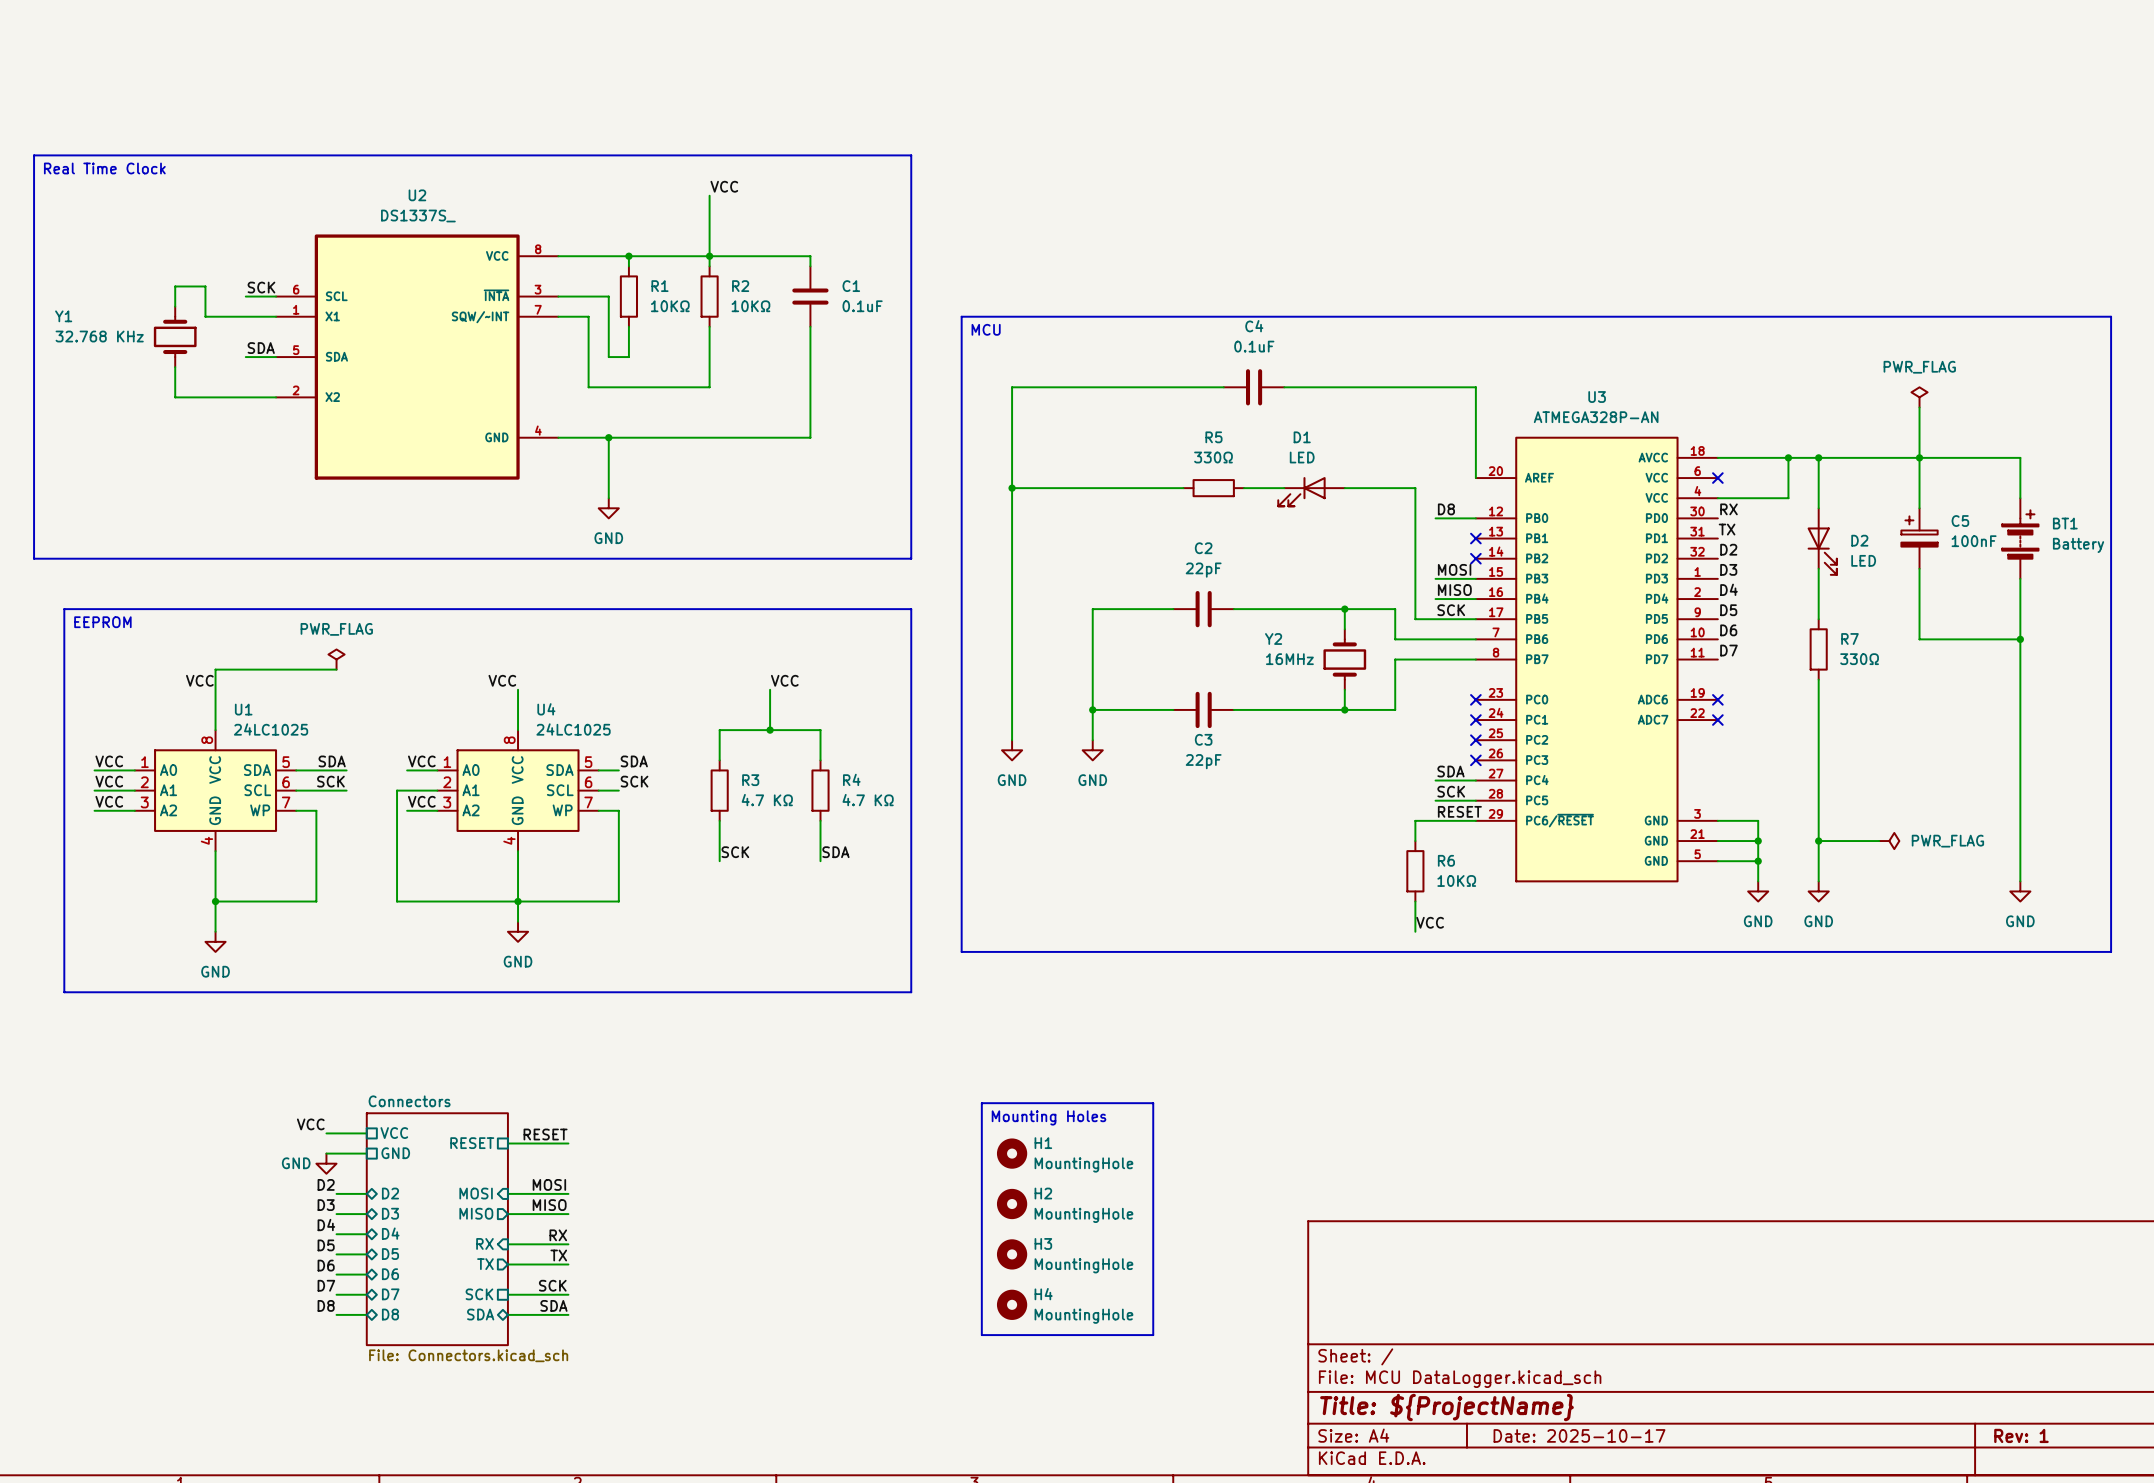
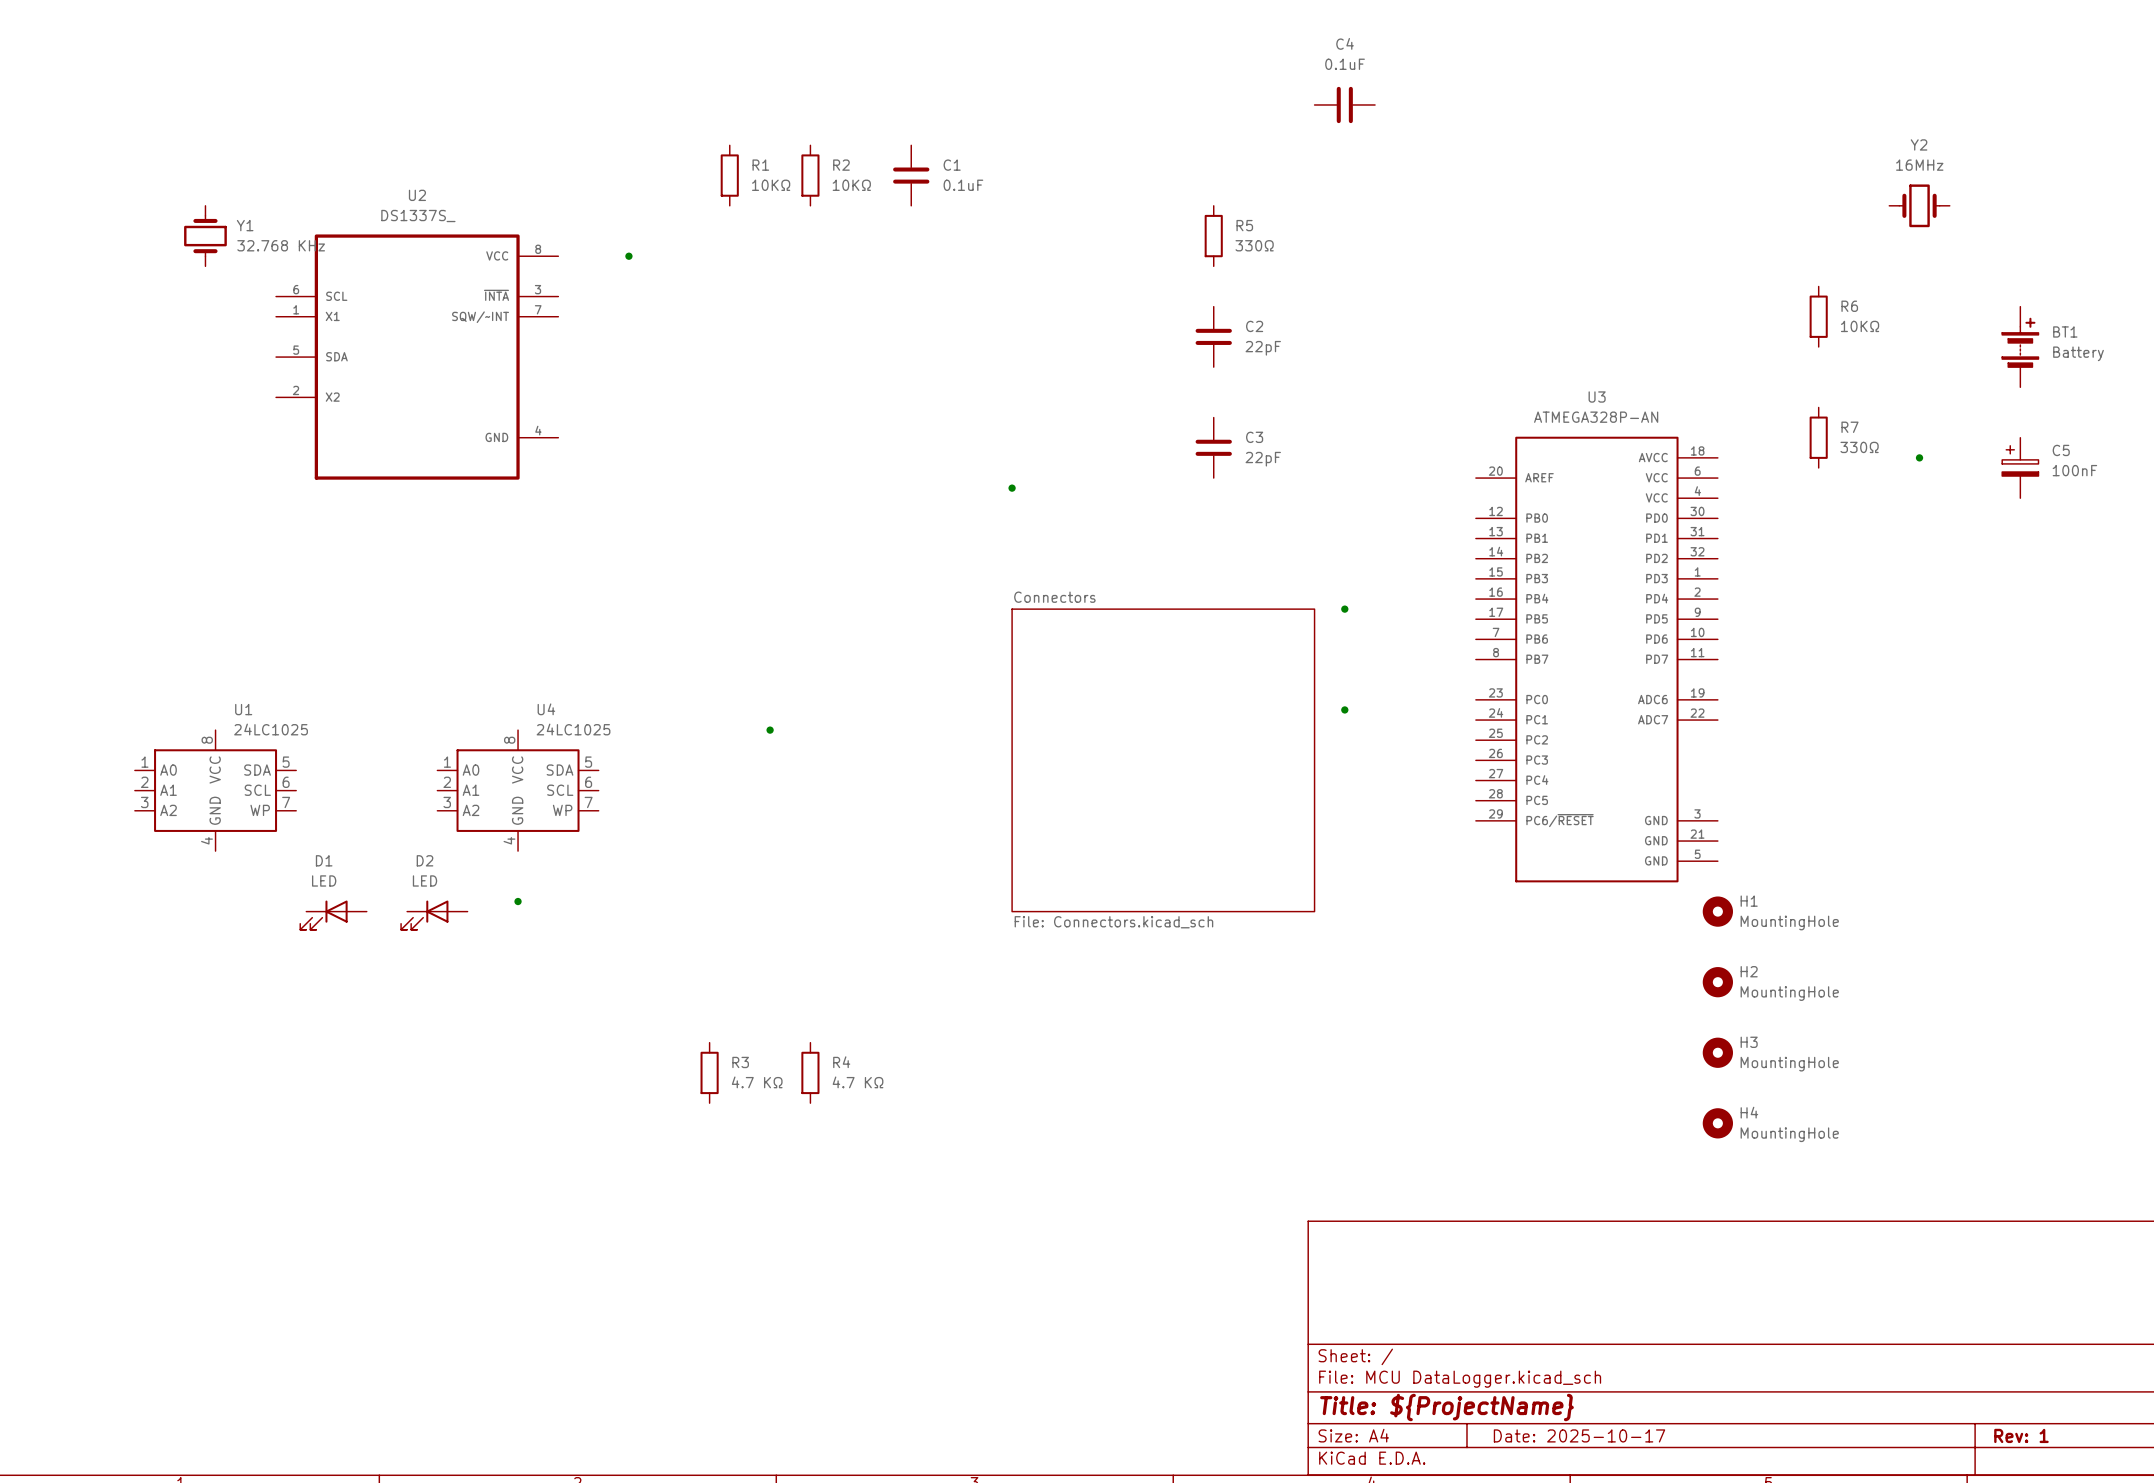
line: (34, 155) (911, 155) (911, 558) (34, 558) (34, 155) -> none
text: Real Time Clock (104, 168) -> none
label: VCC (724, 186) -> none
wire: (709, 195) (709, 266) -> none
wire: (558, 256) (810, 256) (810, 266) -> none
wire: (628, 256) (628, 266) -> none
junction: (709, 256) -> none
label: SCK (261, 287) -> none
wire: (245, 296) (276, 296) -> none
wire: (558, 296) (608, 296) (608, 357) (628, 357) (628, 326) -> none
R1 position: (628, 296) -> (729, 175)
R2 position: (709, 296) -> (810, 175)
C1 position: (810, 296) -> (911, 175)
wire: (175, 306) (175, 286) (205, 286) (205, 316) (276, 316) -> none
Y1 name position: Y1 (63, 316) -> Y1 (245, 225)
wire: (558, 316) (588, 316) (588, 387) (709, 387) (709, 326) -> none
line: (961, 316) (2111, 316) (2111, 951) (961, 951) (961, 316) -> none
wire: (810, 326) (810, 437) (558, 437) -> none
text: MCU (986, 329) -> none
Y1 value position: 32.768 KHz (99, 336) -> 32.768 KHz (281, 245)
Y1 position: (175, 336) -> (205, 236)
label: SDA (261, 348) -> none
wire: (245, 357) (276, 357) -> none
wire: (175, 367) (175, 397) (276, 397) -> none
wire: (1223, 387) (1012, 387) (1012, 740) -> none
C4 position: (1254, 387) -> (1344, 104)
wire: (1284, 387) (1475, 387) (1475, 478) -> none
power symbol: PWR_FLAG (1919, 397) -> none
wire: (1919, 407) (1919, 508) -> none
wire: (608, 437) (608, 498) -> none
junction: (608, 437) -> none
R5 name position: R5 (1213, 437) -> R5 (1244, 225)
R5 value position: 330Ω (1213, 457) -> 330Ω (1254, 245)
wire: (1717, 457) (2020, 457) (2020, 498) -> none
wire: (1788, 457) (1788, 498) (1717, 498) -> none
junction: (1788, 457) -> none
wire: (1818, 457) (1818, 508) -> none
junction: (1818, 457) -> none
no-connect mark: (1717, 478) -> none
wire: (1012, 488) (1183, 488) -> none
R5 rotation: 0° (1213, 488) -> 90° clockwise (1213, 236)
R5 position: (1213, 488) -> (1213, 236)
wire: (1243, 488) (1284, 488) -> none
wire: (1344, 488) (1415, 488) (1415, 619) (1475, 619) -> none
D1 position: (1311, 491) -> (333, 915)
power symbol: GND (608, 508) -> none
label: D8 (1446, 509) -> none
label: RX (1728, 509) -> none
wire: (1435, 518) (1475, 518) -> none
label: TX (1727, 529) -> none
no-connect mark: (1475, 538) -> none
C5 position: (1919, 538) -> (2020, 467)
BT1 position: (2020, 538) -> (2020, 346)
D2 name position: D2 (1859, 540) -> D2 (425, 860)
D2 position: (1822, 541) -> (434, 915)
C2 name position: C2 (1203, 548) -> C2 (1254, 326)
label: D2 (1728, 549) -> none
D2 rotation: 0° (1822, 551) -> 90° clockwise (424, 915)
no-connect mark: (1475, 558) -> none
D2 value position: LED (1863, 560) -> LED (425, 880)
wire: (1818, 568) (1818, 619) -> none
wire: (1919, 568) (1919, 639) (2020, 639) -> none
label: MOSI (1454, 569) -> none
label: D3 (1728, 569) -> none
wire: (1435, 578) (1475, 578) -> none
wire: (2020, 578) (2020, 881) -> none
label: D4 (1728, 589) -> none
label: MISO (1454, 590) -> none
wire: (1435, 599) (1475, 599) -> none
line: (64, 609) (911, 609) (911, 992) (64, 992) (64, 609) -> none
wire: (1173, 609) (1092, 609) (1092, 740) -> none
C2 rotation: 0° (1203, 609) -> 90° clockwise (1213, 336)
C2 position: (1203, 609) -> (1213, 336)
wire: (1233, 609) (1395, 609) (1395, 639) (1475, 639) -> none
wire: (1344, 609) (1344, 629) -> none
label: SCK (1451, 610) -> none
label: D5 (1728, 610) -> none
text: EEPROM (102, 622) -> none
label: D6 (1728, 630) -> none
Y2 name position: Y2 (1273, 638) -> Y2 (1919, 144)
junction: (2020, 639) -> none
R7 position: (1818, 649) -> (1818, 437)
label: D7 (1728, 650) -> none
power symbol: PWR_FLAG (336, 659) -> none
Y2 rotation: 0° (1344, 659) -> 90° clockwise (1919, 205)
Y2 position: (1344, 659) -> (1919, 205)
wire: (1475, 659) (1395, 659) (1395, 709) (1233, 709) -> none
wire: (336, 669) (215, 669) (215, 730) -> none
wire: (1818, 679) (1818, 881) -> none
label: VCC (199, 680) -> none
label: VCC (502, 680) -> none
label: VCC (784, 680) -> none
wire: (518, 689) (518, 730) -> none
wire: (770, 689) (770, 730) -> none
wire: (1344, 689) (1344, 709) -> none
no-connect mark: (1475, 699) -> none
no-connect mark: (1717, 699) -> none
wire: (1092, 709) (1173, 709) -> none
junction: (1092, 709) -> none
C3 rotation: 0° (1203, 709) -> 90° clockwise (1213, 447)
C3 position: (1203, 709) -> (1213, 447)
no-connect mark: (1475, 720) -> none
no-connect mark: (1717, 720) -> none
C3 name position: C3 (1203, 739) -> C3 (1254, 437)
no-connect mark: (1475, 740) -> none
power symbol: GND (1012, 750) -> none
power symbol: GND (1092, 750) -> none
wire: (719, 760) (719, 730) (820, 730) (820, 760) -> none
sheet Connectors: none -> File: Connectors.kicad_sch (1163, 760)
no-connect mark: (1475, 760) -> none
label: VCC (109, 761) -> none
label: SDA (332, 761) -> none
label: VCC (421, 761) -> none
label: SDA (634, 761) -> none
C3 value position: 22pF (1203, 761) -> 22pF (1263, 459)
wire: (94, 770) (134, 770) -> none
wire: (296, 770) (346, 770) -> none
wire: (407, 770) (437, 770) -> none
wire: (598, 770) (618, 770) -> none
label: SDA (1450, 771) -> none
wire: (1435, 780) (1475, 780) -> none
label: VCC (109, 781) -> none
label: SCK (330, 781) -> none
label: SCK (634, 781) -> none
wire: (94, 790) (134, 790) -> none
wire: (296, 790) (346, 790) -> none
wire: (437, 790) (397, 790) (397, 901) (618, 901) (618, 810) (598, 810) -> none
wire: (598, 790) (618, 790) -> none
R3 position: (719, 790) -> (709, 1072)
R4 position: (820, 790) -> (810, 1072)
label: SCK (1451, 791) -> none
wire: (1435, 800) (1475, 800) -> none
label: VCC (109, 801) -> none
label: VCC (421, 801) -> none
wire: (94, 810) (134, 810) -> none
wire: (296, 810) (316, 810) (316, 901) (215, 901) -> none
wire: (407, 810) (437, 810) -> none
label: RESET (1459, 811) -> none
wire: (719, 820) (719, 861) -> none
wire: (820, 820) (820, 861) -> none
wire: (1475, 820) (1415, 820) (1415, 841) -> none
wire: (1717, 820) (1758, 820) (1758, 881) -> none
wire: (1717, 841) (1758, 841) -> none
junction: (1758, 841) -> none
wire: (1818, 841) (1879, 841) -> none
junction: (1818, 841) -> none
power symbol: PWR_FLAG (1889, 841) -> none
wire: (215, 851) (215, 931) -> none
wire: (518, 851) (518, 921) -> none
label: SCK (735, 852) -> none
label: SDA (835, 852) -> none
wire: (1717, 861) (1758, 861) -> none
junction: (1758, 861) -> none
R6 position: (1415, 871) -> (1818, 316)
power symbol: GND (1758, 891) -> none
power symbol: GND (1818, 891) -> none
power symbol: GND (2020, 891) -> none
junction: (215, 901) -> none
wire: (1415, 901) (1415, 931) -> none
label: VCC (1430, 922) -> none
power symbol: GND (518, 931) -> none
power symbol: GND (215, 941) -> none
line: (981, 1103) (1153, 1103) (1153, 1335) (981, 1335) (981, 1103) -> none
text: Mounting Holes (1049, 1117) -> none
label: VCC (310, 1124) -> none
wire: (326, 1133) (366, 1133) -> none
sheet pin: VCC (394, 1133) -> none
label: RESET (545, 1134) -> none
sheet pin: RESET (472, 1143) -> none
wire: (507, 1143) (568, 1143) -> none
wire: (326, 1153) (366, 1153) -> none
sheet pin: GND (395, 1153) -> none
H1 position: (1012, 1153) -> (1717, 911)
power symbol: GND (326, 1163) -> none
label: D2 (326, 1184) -> none
label: MOSI (549, 1184) -> none
wire: (336, 1193) (366, 1193) -> none
sheet pin: D2 (390, 1193) -> none
sheet pin: MOSI (476, 1193) -> none
wire: (507, 1193) (568, 1193) -> none
H2 position: (1012, 1204) -> (1717, 982)
label: D3 (326, 1205) -> none
label: MISO (549, 1205) -> none
sheet pin: D3 (390, 1213) -> none
sheet pin: MISO (476, 1213) -> none
wire: (336, 1214) (366, 1214) -> none
wire: (507, 1214) (568, 1214) -> none
label: D4 (326, 1225) -> none
sheet Connectors: File: Connectors.kicad_sch (437, 1229) -> none
sheet pin: D4 (390, 1233) -> none
wire: (336, 1234) (366, 1234) -> none
label: RX (558, 1235) -> none
sheet pin: RX (484, 1243) -> none
wire: (507, 1244) (568, 1244) -> none
label: D5 (326, 1245) -> none
wire: (336, 1254) (366, 1254) -> none
sheet pin: D5 (390, 1254) -> none
H3 position: (1012, 1254) -> (1717, 1052)
label: TX (558, 1255) -> none
sheet pin: TX (485, 1264) -> none
wire: (507, 1264) (568, 1264) -> none
label: D6 (326, 1265) -> none
wire: (336, 1274) (366, 1274) -> none
sheet pin: D6 (390, 1274) -> none
label: D7 (326, 1285) -> none
label: SCK (552, 1285) -> none
wire: (336, 1294) (366, 1294) -> none
sheet pin: D7 (390, 1294) -> none
sheet pin: SCK (479, 1294) -> none
wire: (507, 1294) (568, 1294) -> none
H4 position: (1012, 1304) -> (1717, 1123)
label: D8 (326, 1305) -> none
label: SDA (553, 1305) -> none
wire: (336, 1314) (366, 1314) -> none
sheet pin: D8 (390, 1314) -> none
sheet pin: SDA (480, 1314) -> none
wire: (507, 1314) (568, 1314) -> none

